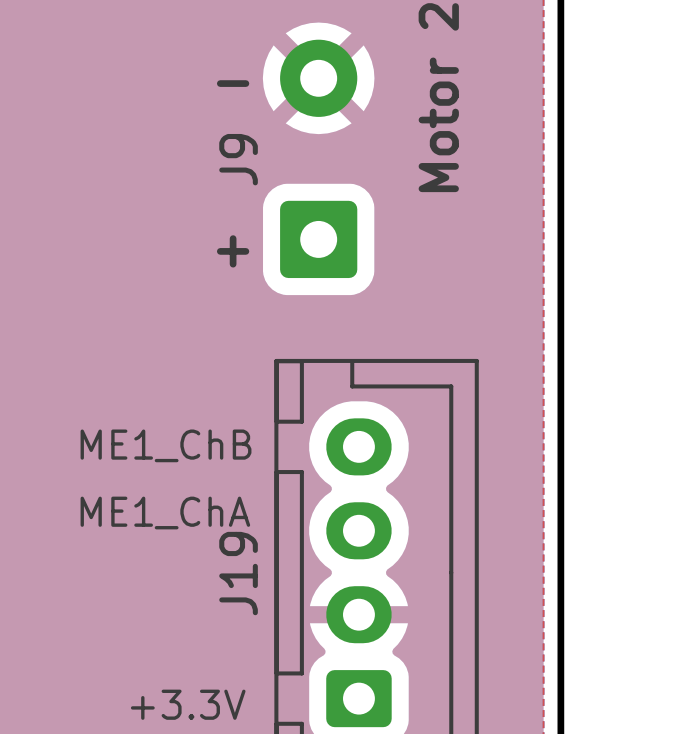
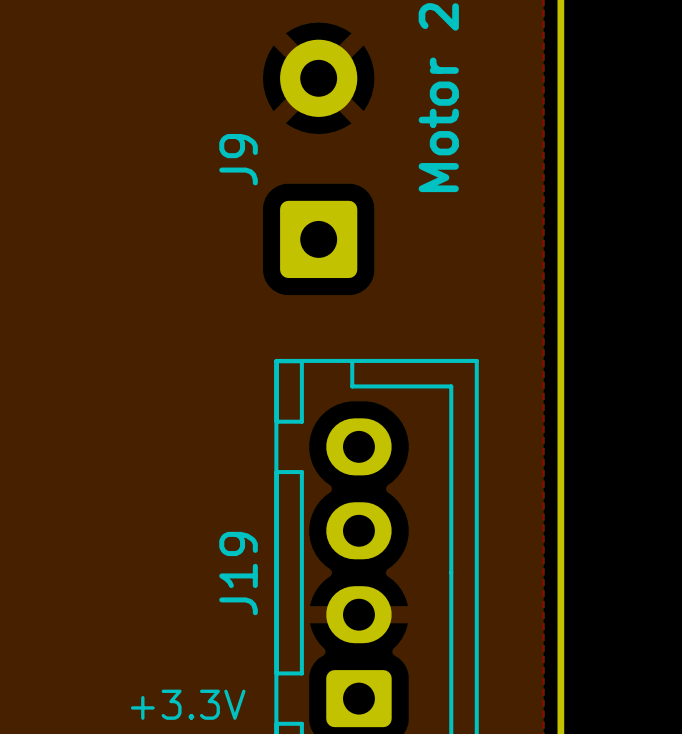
text: - (233, 83) -> none
text: + (233, 251) -> none
text: ME1_ChB (166, 445) -> none
text: ME1_ChA (165, 513) -> none

